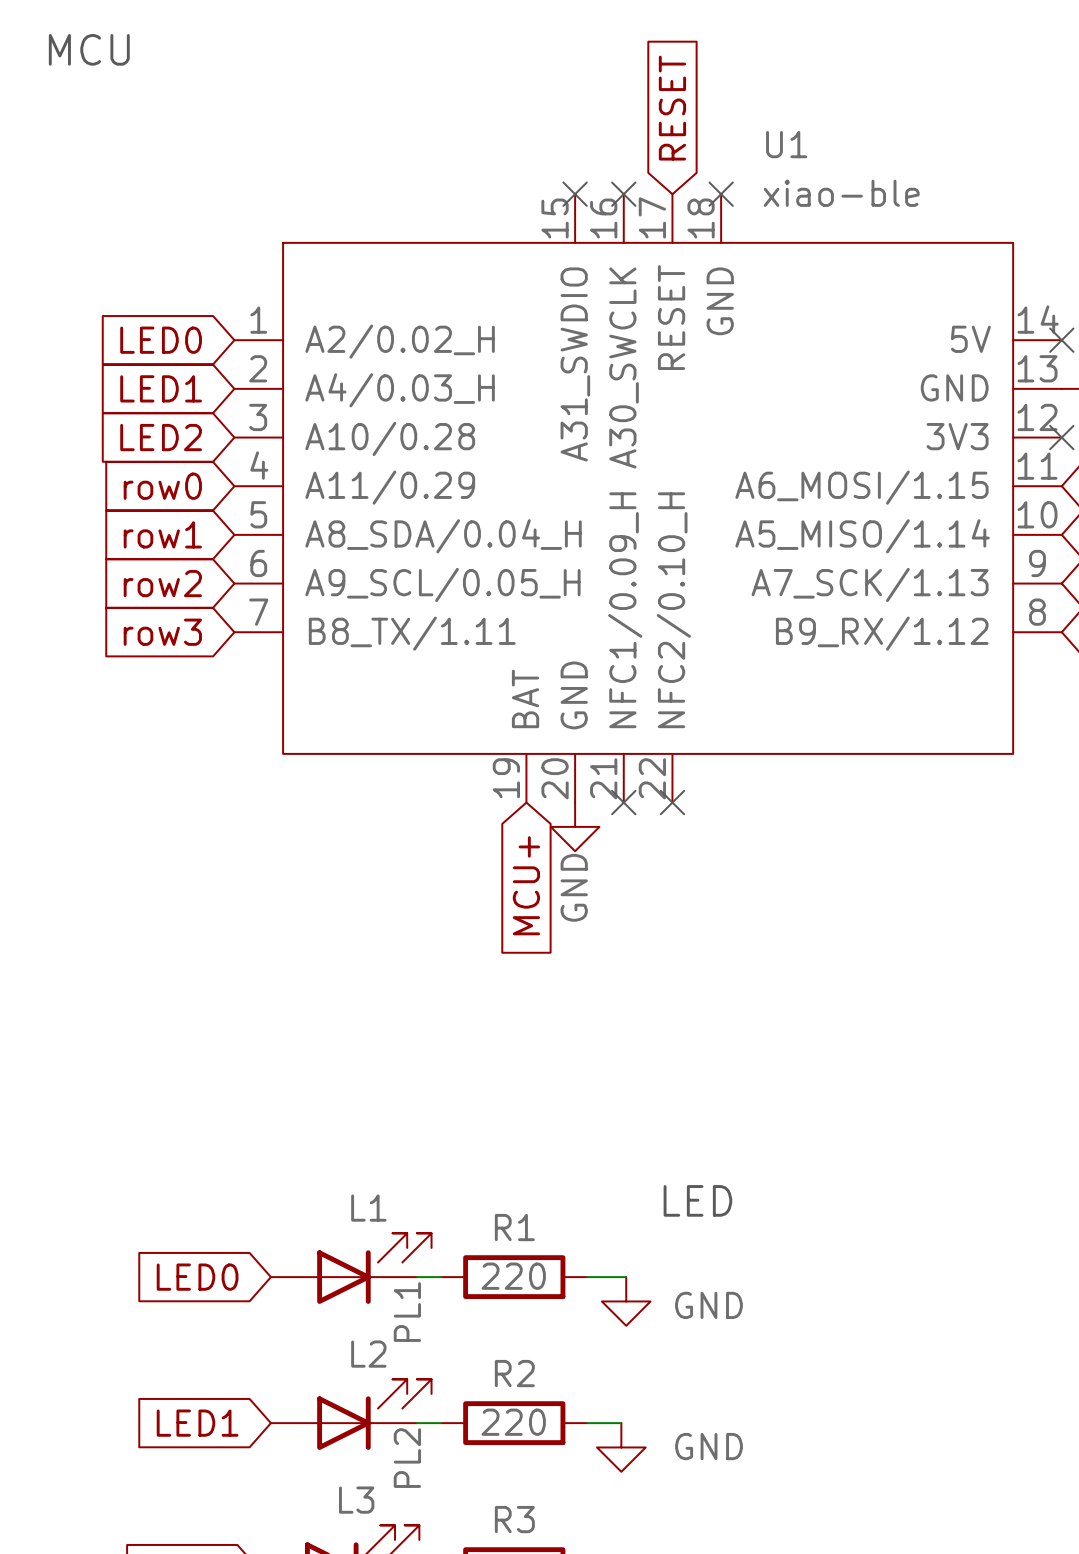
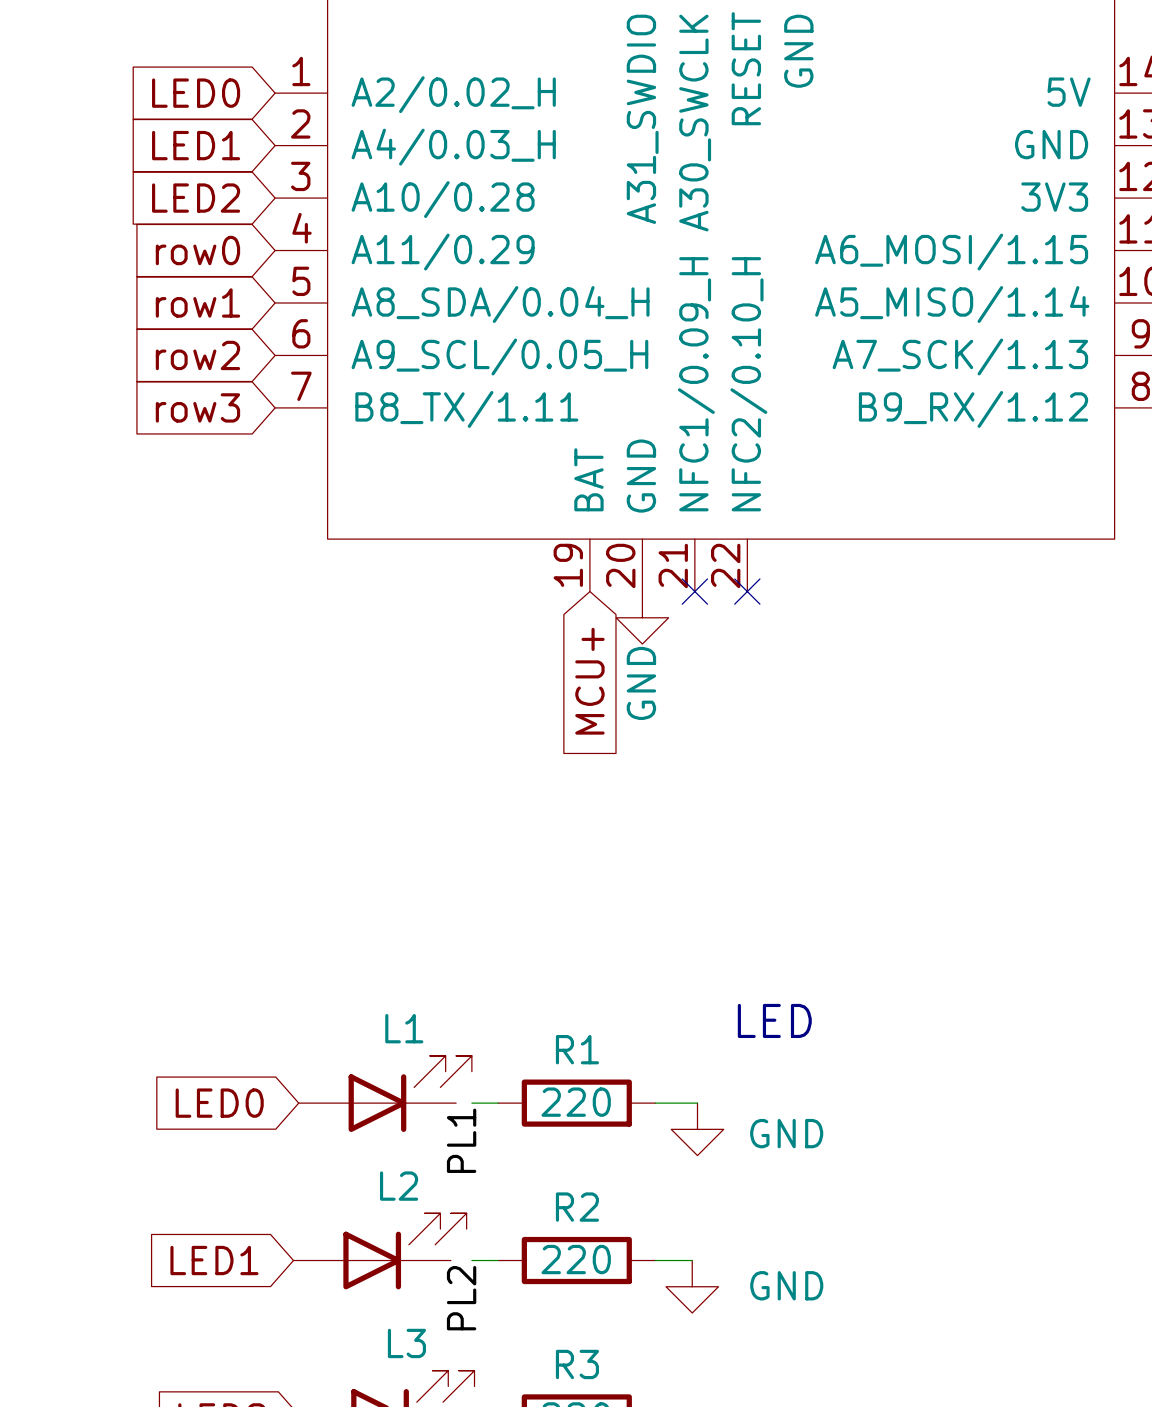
L1 position: (351, 1268) -> (385, 1093)
global label position: LED0 (197, 1277) -> LED0 (219, 1103)
L2 position: (351, 1414) -> (380, 1251)
global label position: LED1 (197, 1423) -> LED1 (214, 1260)

